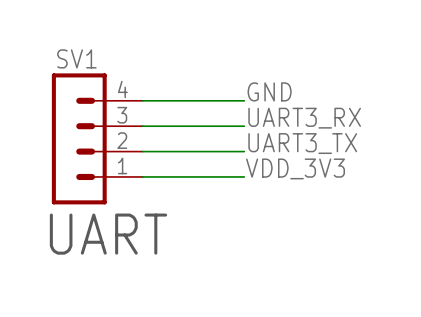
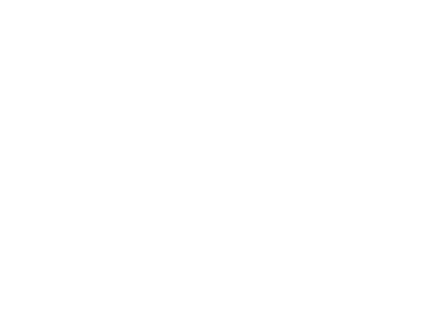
label: GND (269, 91) -> none
wire: (142, 100) (244, 100) -> none
label: UART3_RX (304, 118) -> none
wire: (142, 126) (244, 126) -> none
SV1: (97, 138) -> none
label: UART3_TX (302, 143) -> none
wire: (142, 151) (244, 151) -> none
label: VDD_3V3 (295, 168) -> none
wire: (142, 176) (244, 176) -> none
text: UART (108, 234) -> none

